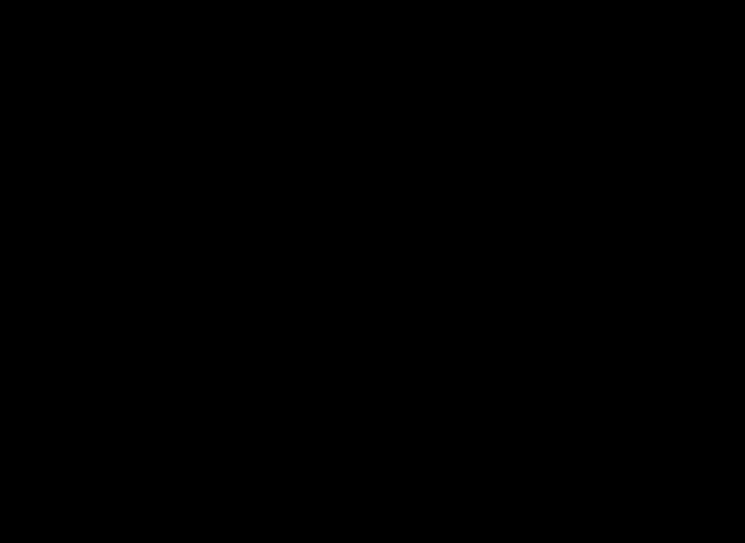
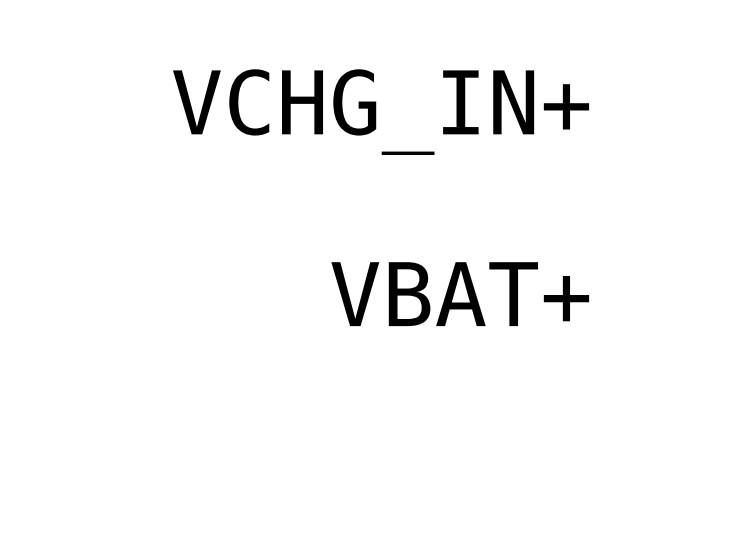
label: none -> VCHG_IN+ (381, 112)
label: none -> VBAT+ (460, 294)

